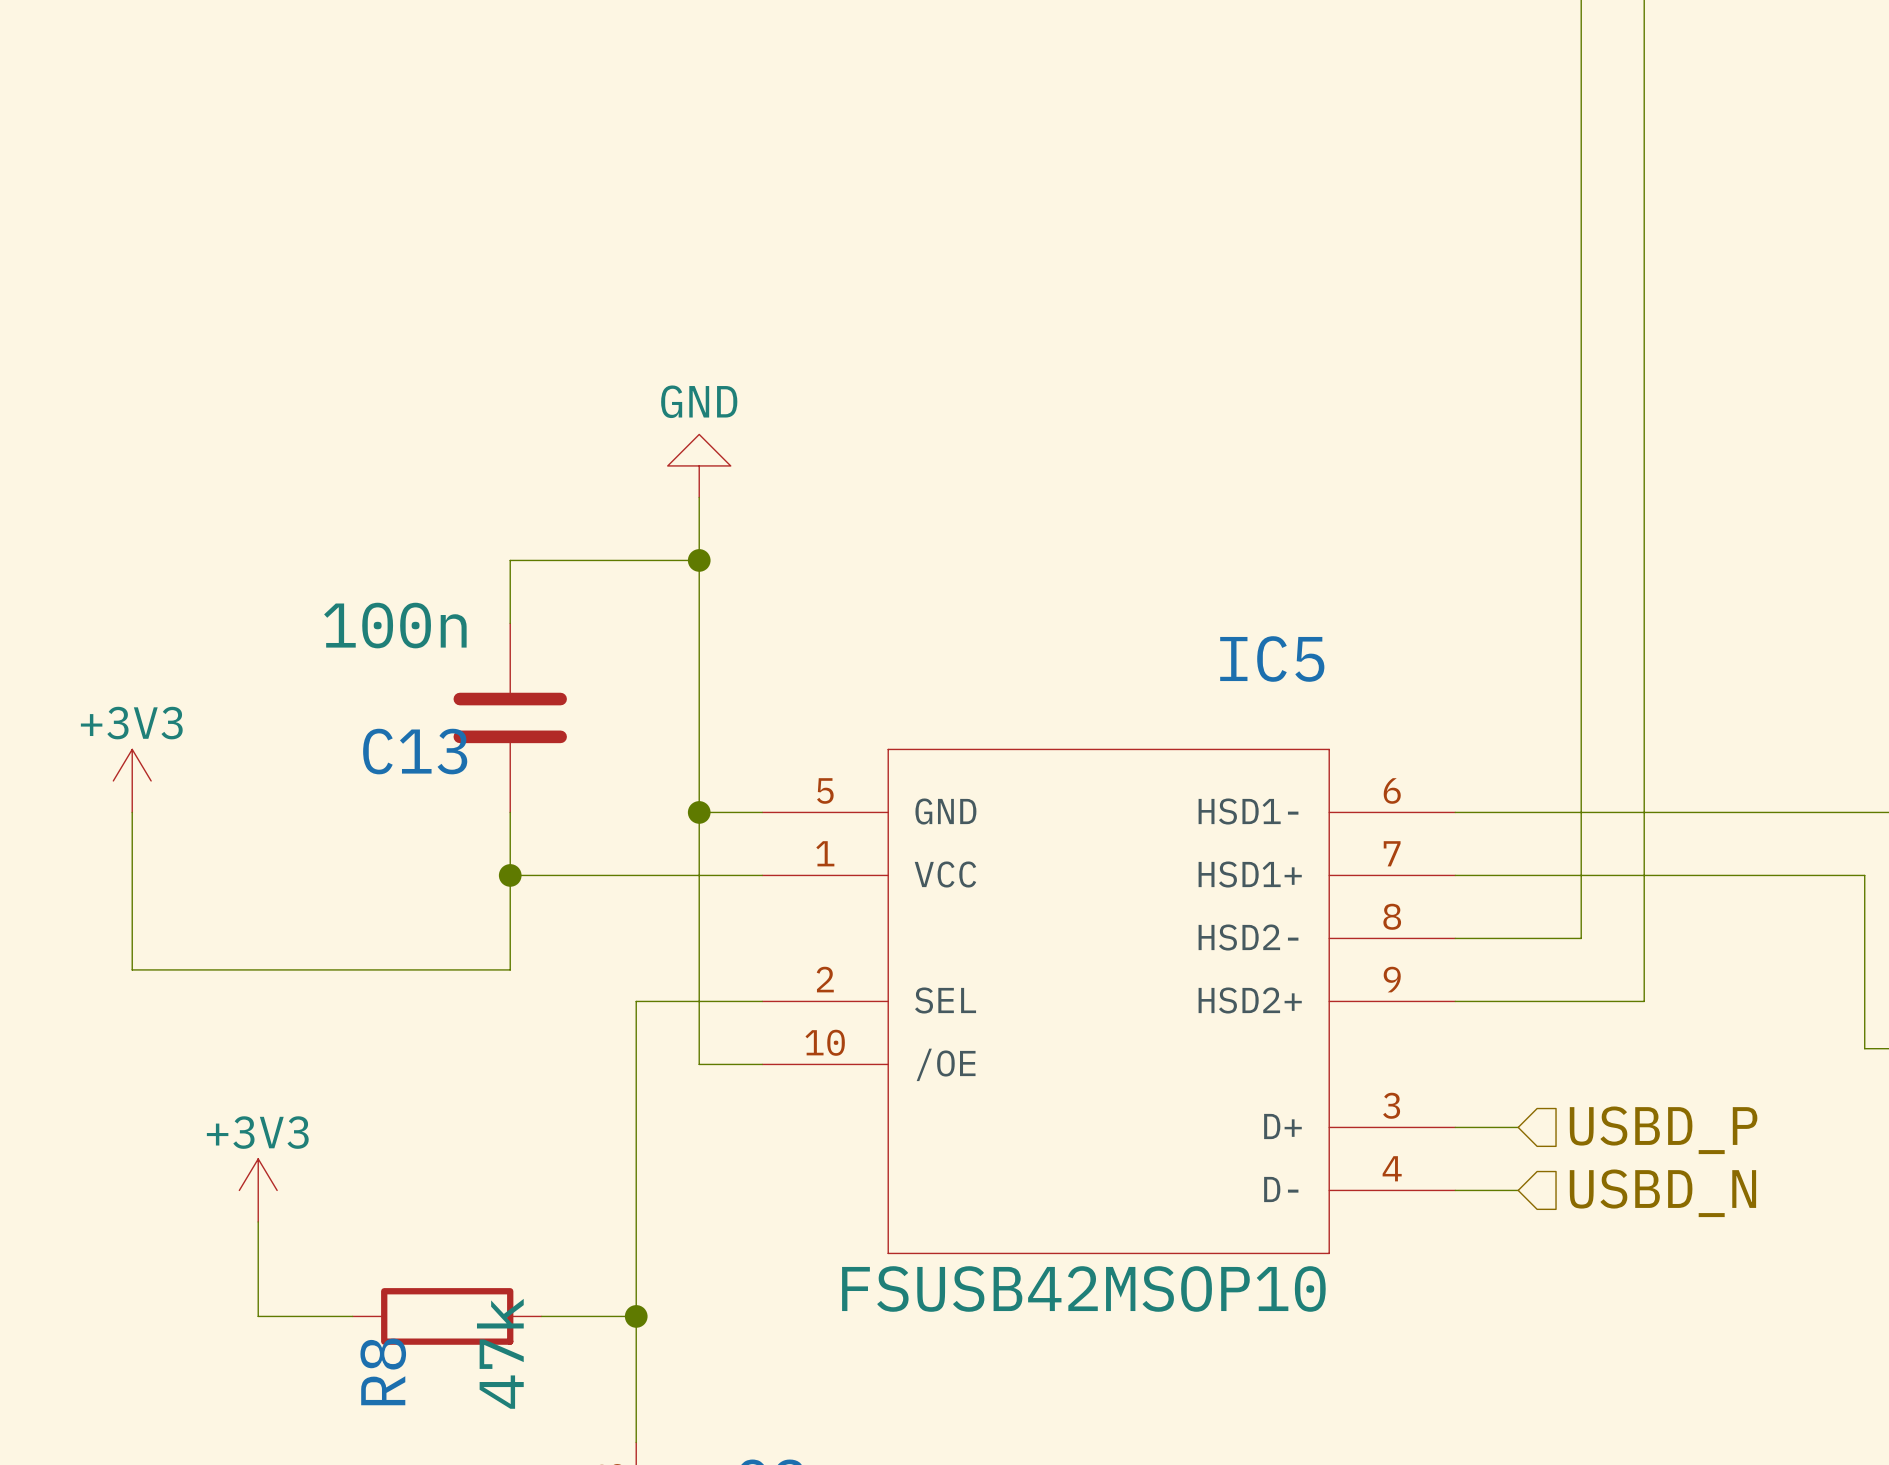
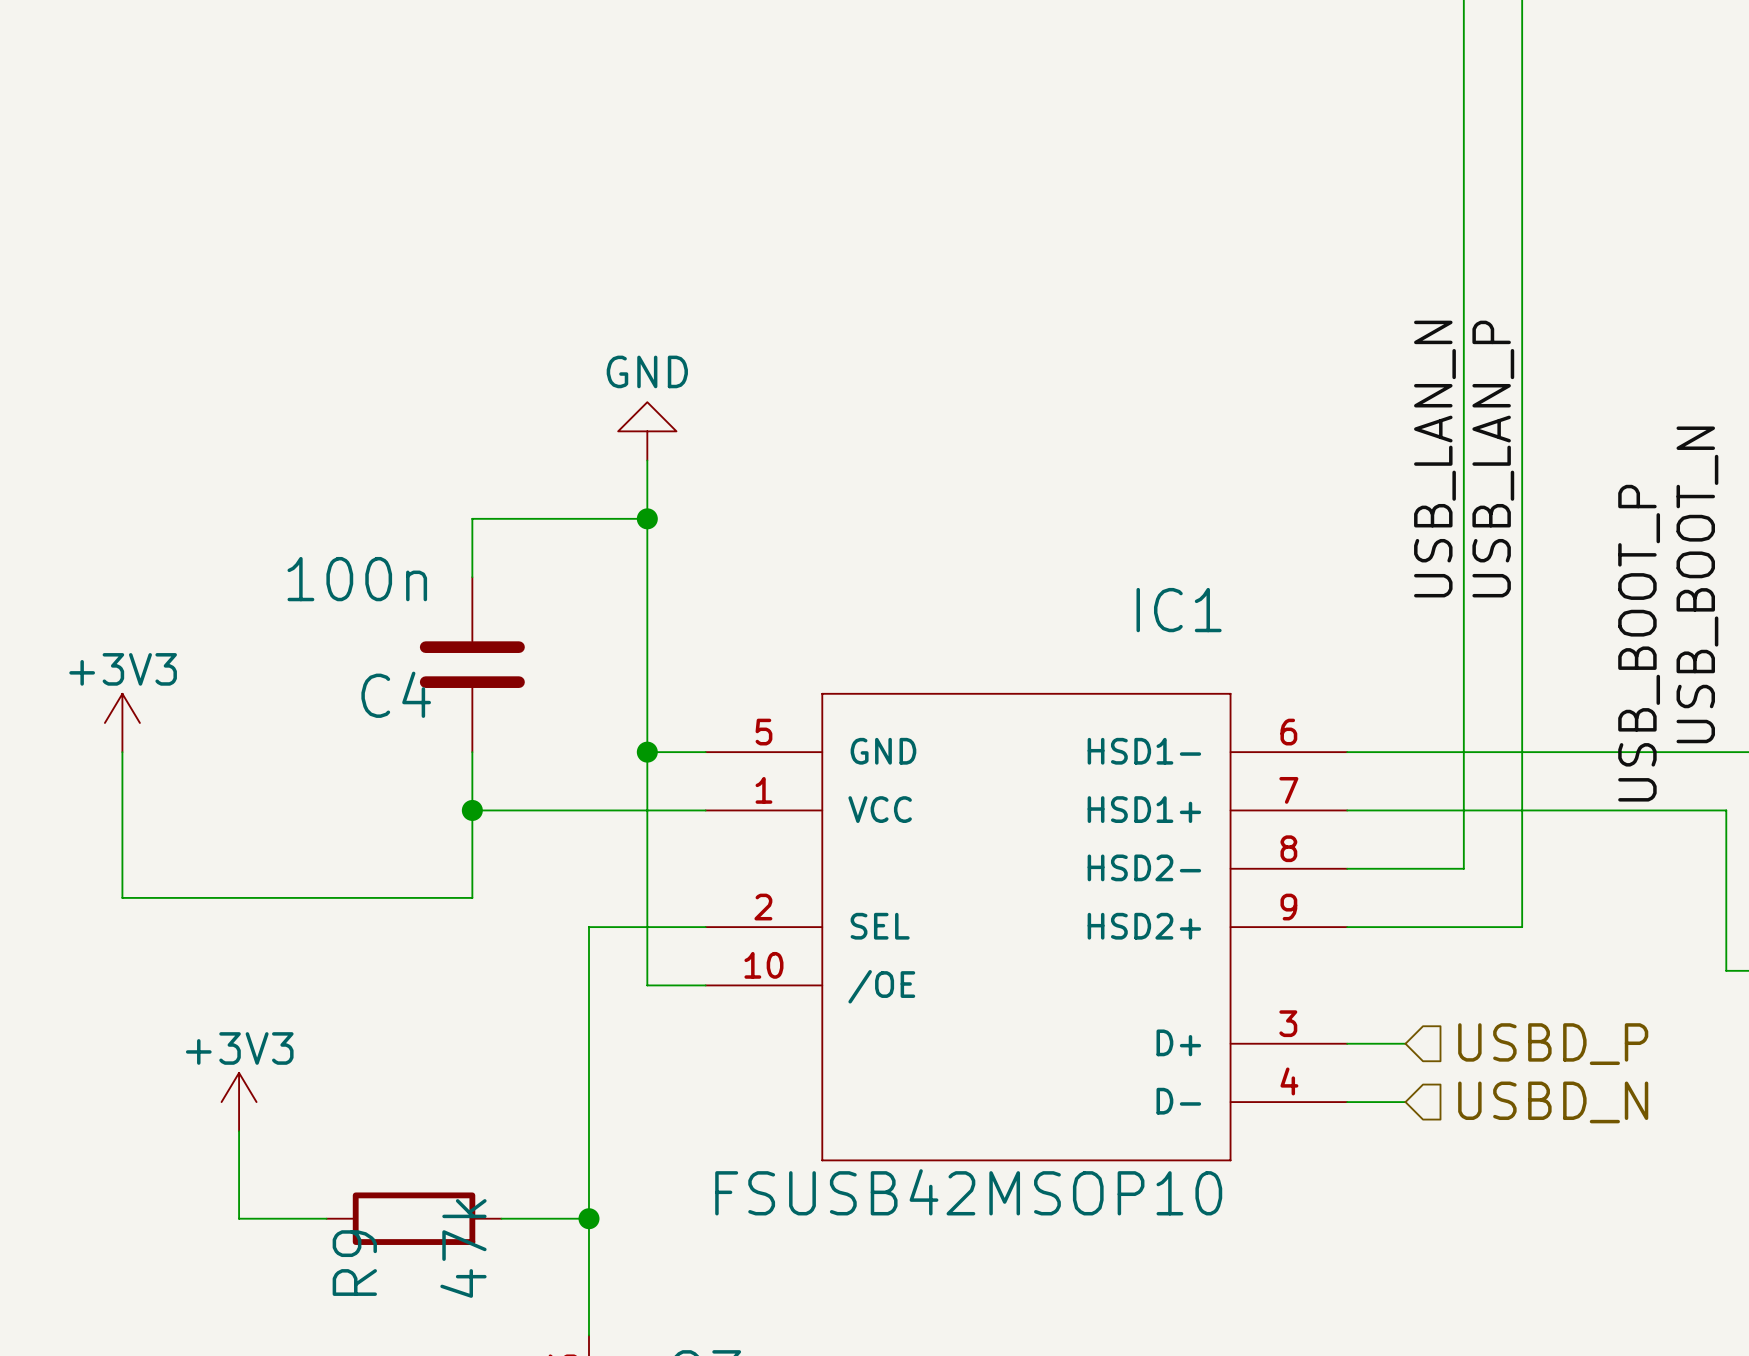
label: none -> USB_LAN_N (1434, 459)
label: none -> USB_LAN_P (1493, 459)
label: none -> USB_BOOT_N (1697, 584)
IC5 name: IC5 (1272, 659) -> IC1 (1179, 610)
label: none -> USB_BOOT_P (1639, 643)
C13 name: C13 (415, 751) -> C4 (396, 694)
R8 name: R8 (383, 1371) -> R9 (354, 1263)

